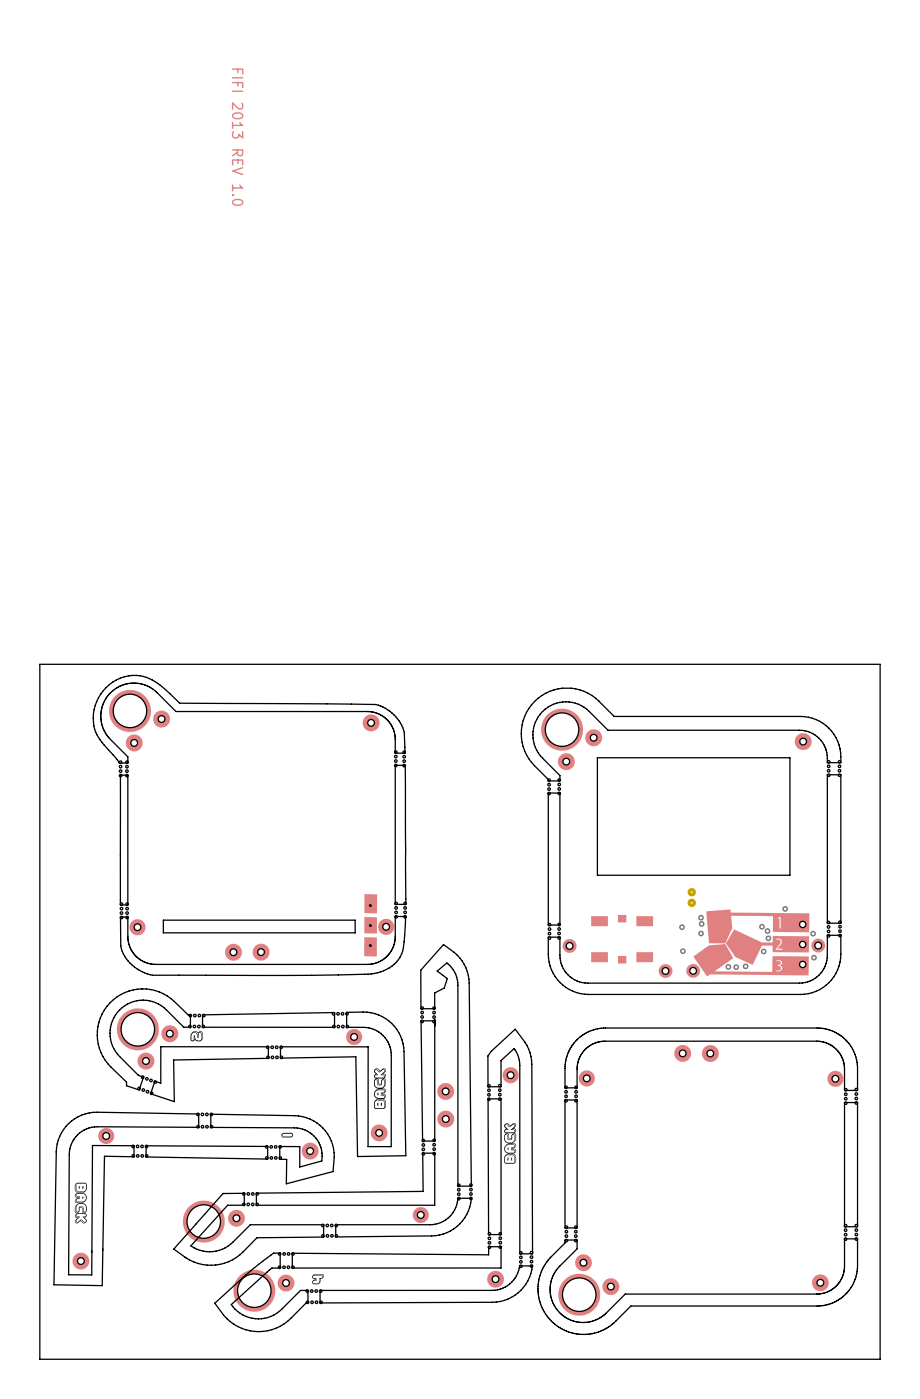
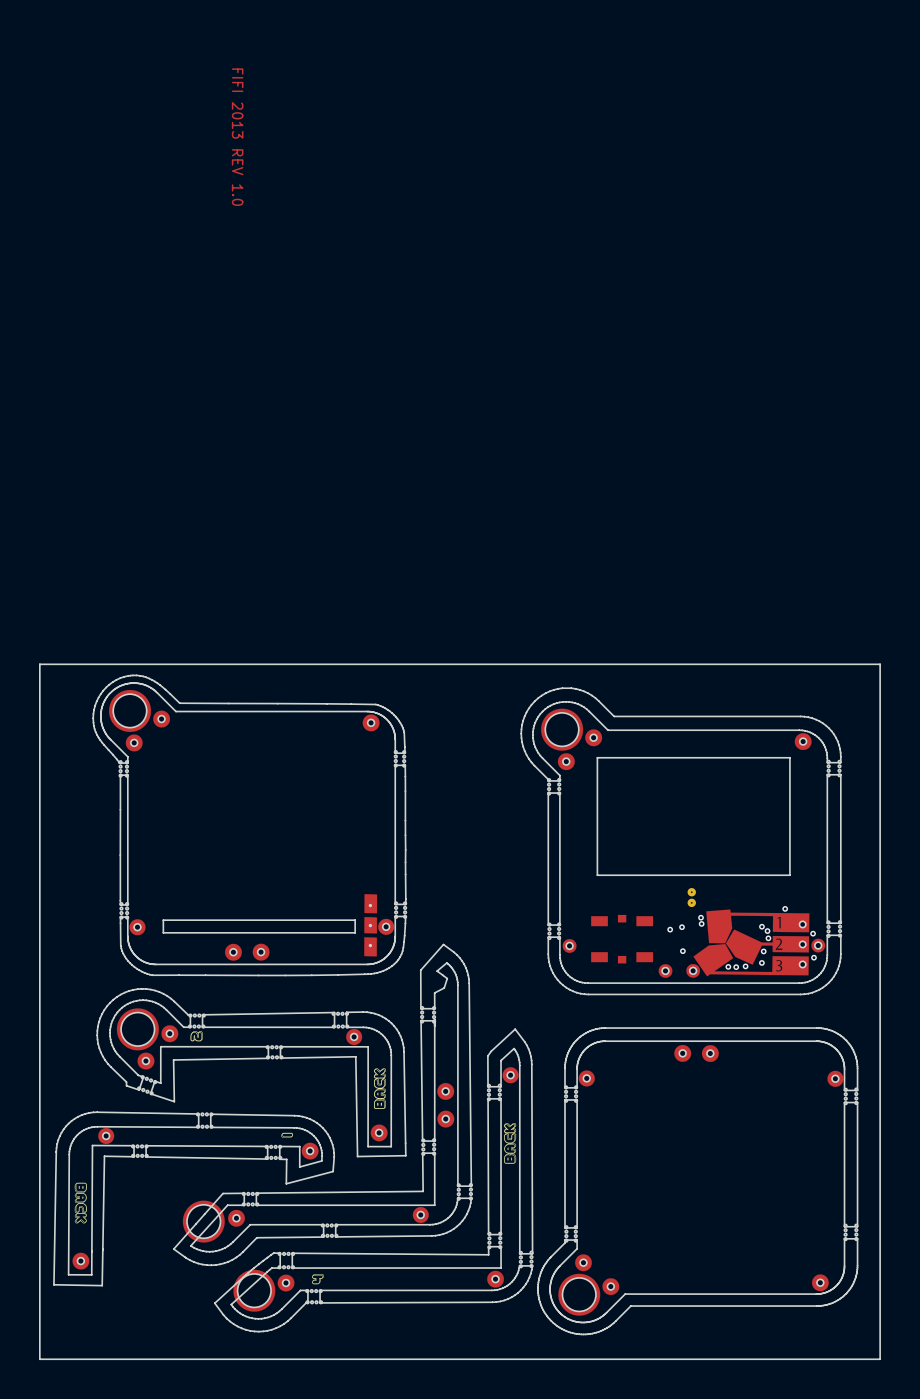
via position: (701, 933) -> (670, 929)
via: none -> (761, 962)

